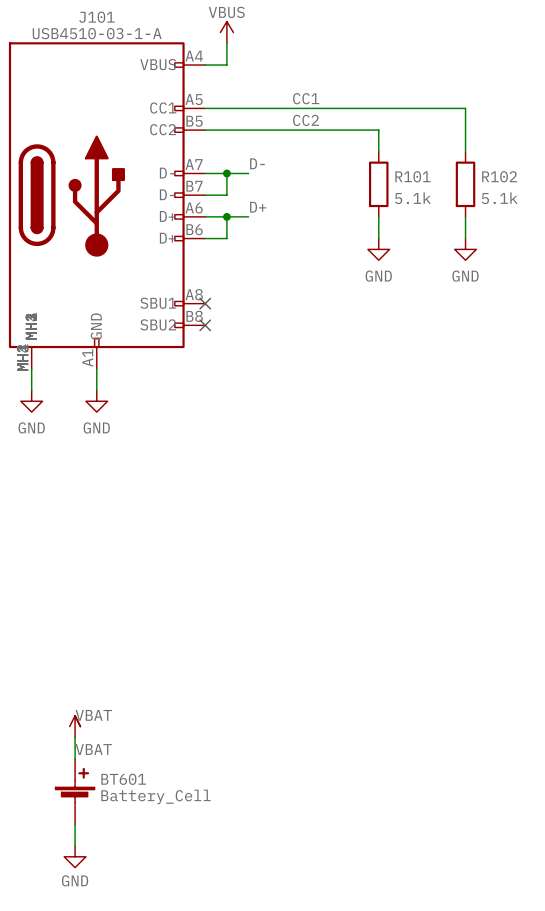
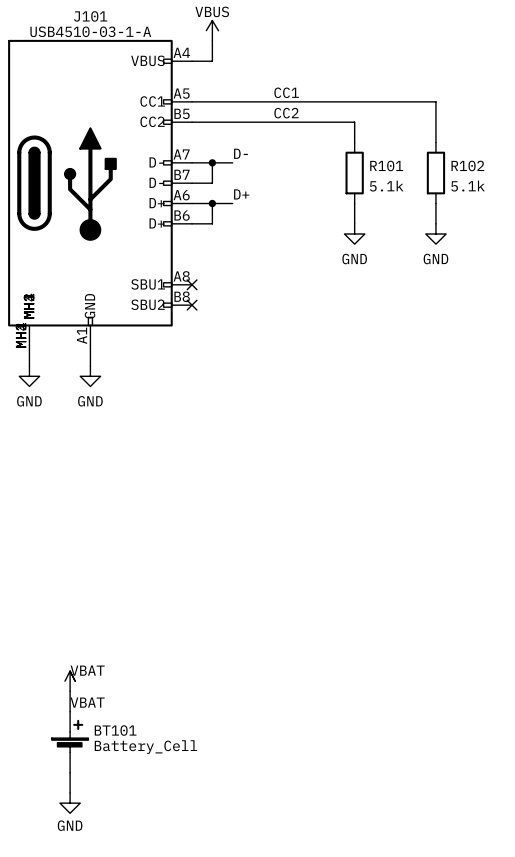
BT601 name: BT601 (123, 779) -> BT101 (115, 730)

